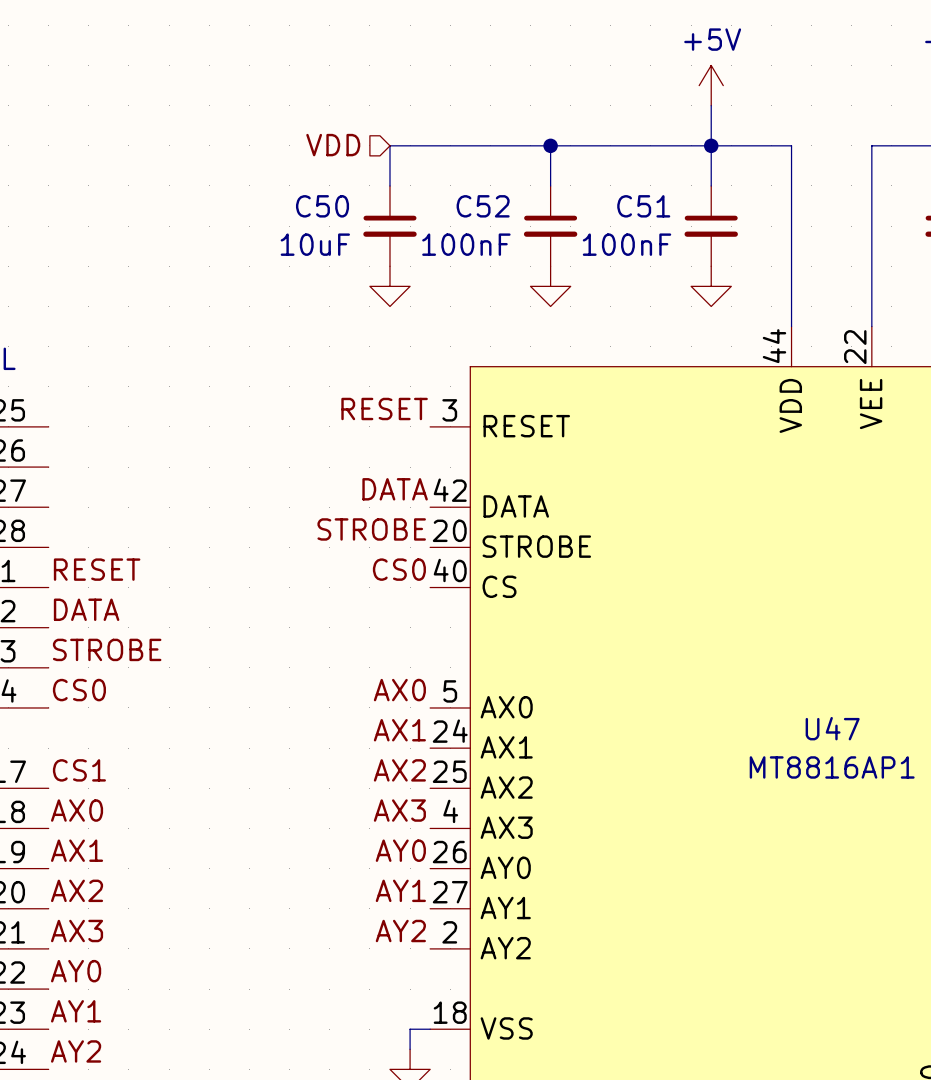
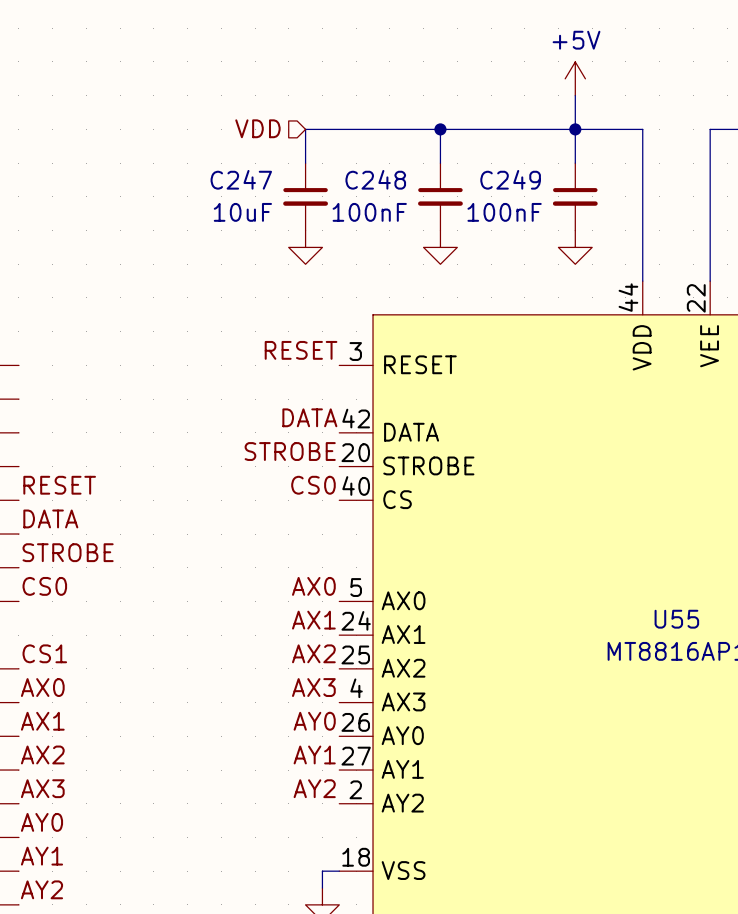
C50 name: C50 (322, 206) -> C247 (241, 179)
C52 name: C52 (483, 206) -> C248 (375, 179)
C51 name: C51 (643, 206) -> C249 (510, 179)
U47 name: U47 (832, 728) -> U55 (676, 619)

